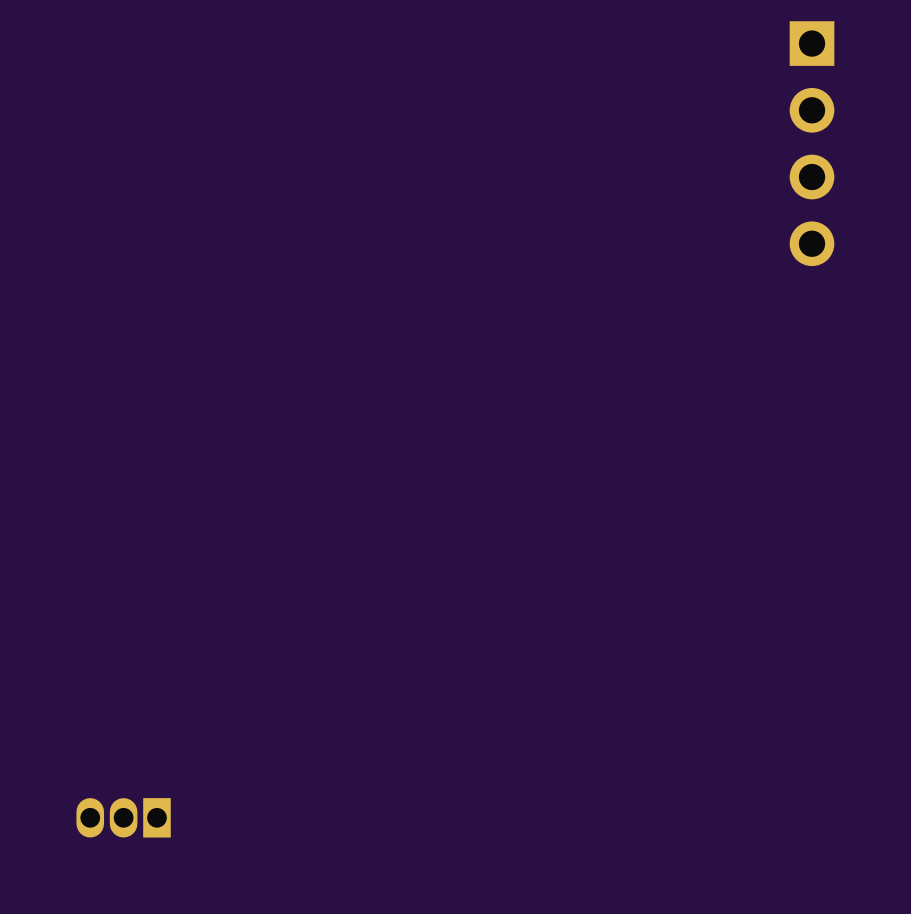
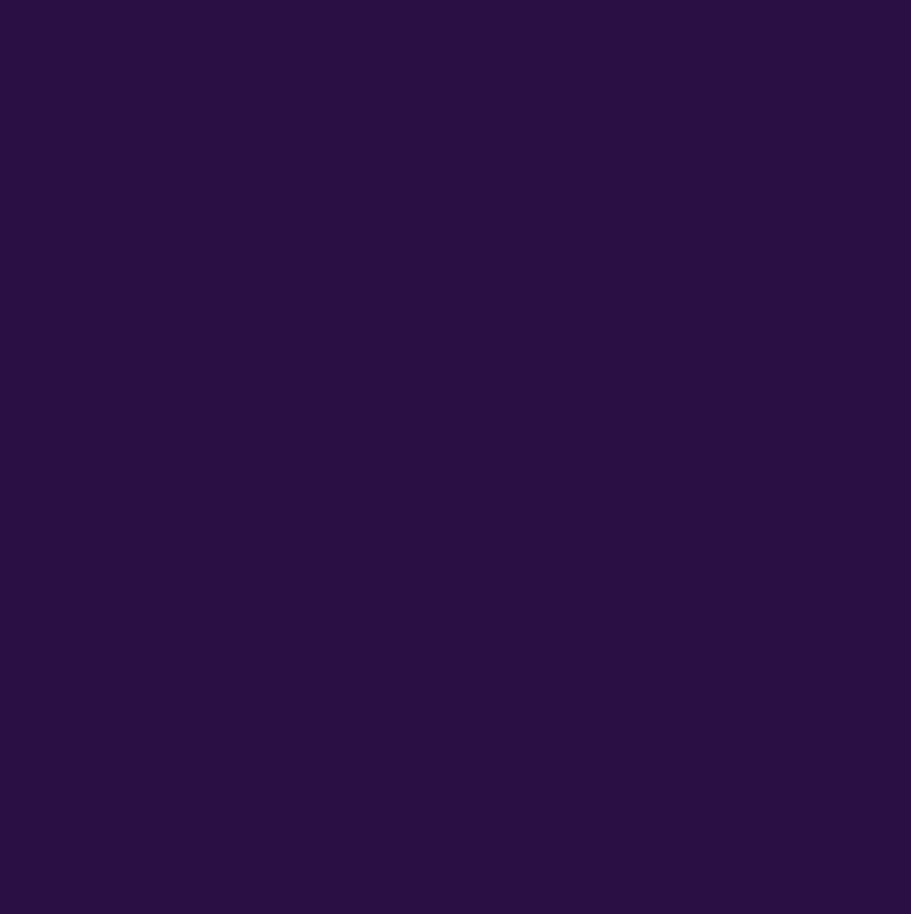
part: (812, 143) -> none
part: (123, 817) -> none

